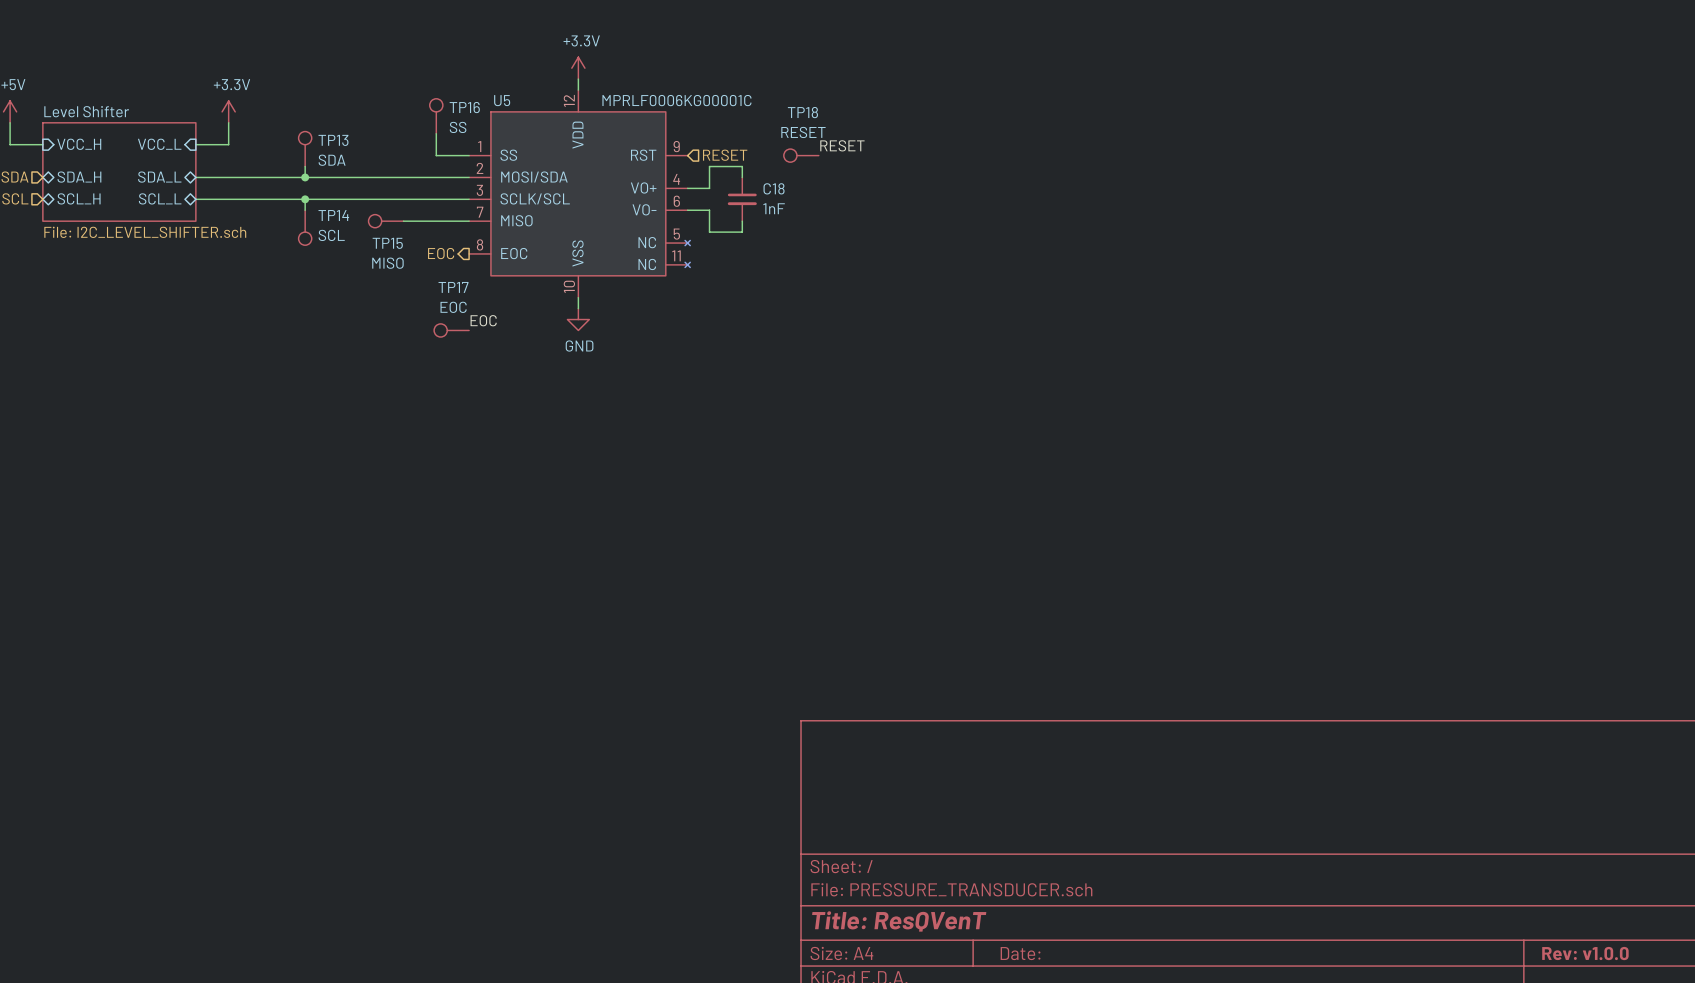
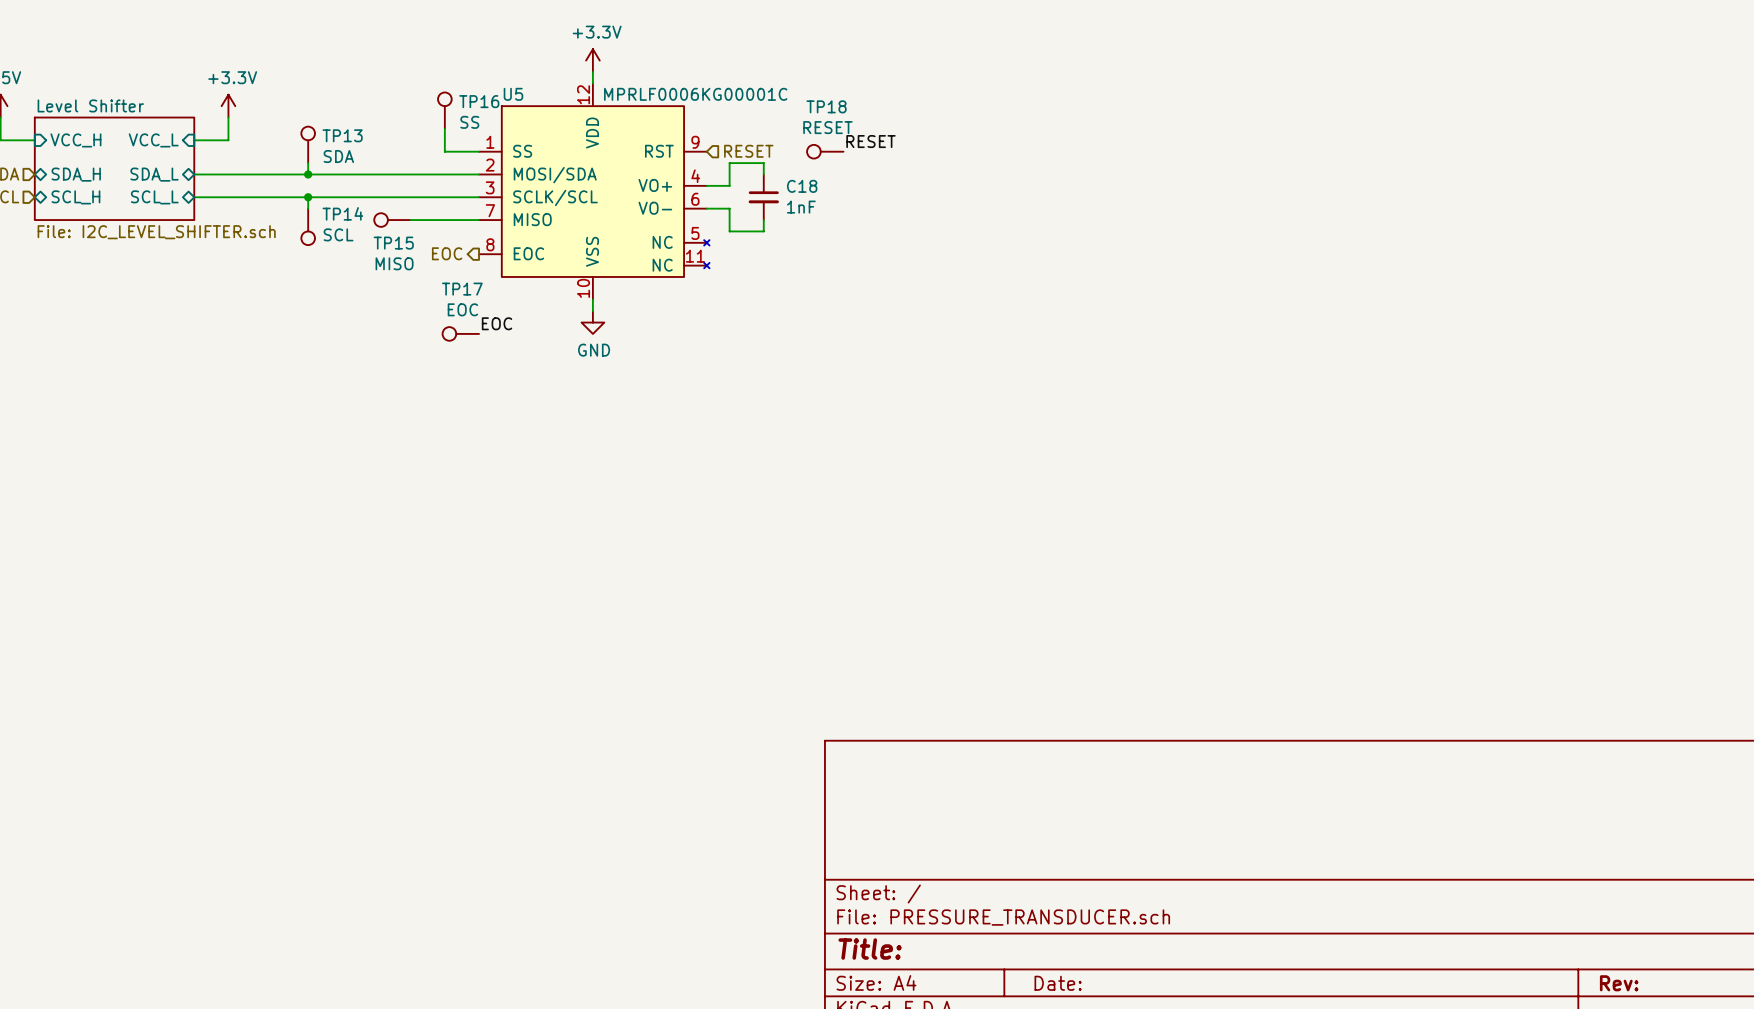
title block: Title: ResQVenT (899, 921) -> Title: (870, 949)
title block: Rev: v1.0.0 (1585, 953) -> Rev: (1619, 983)

